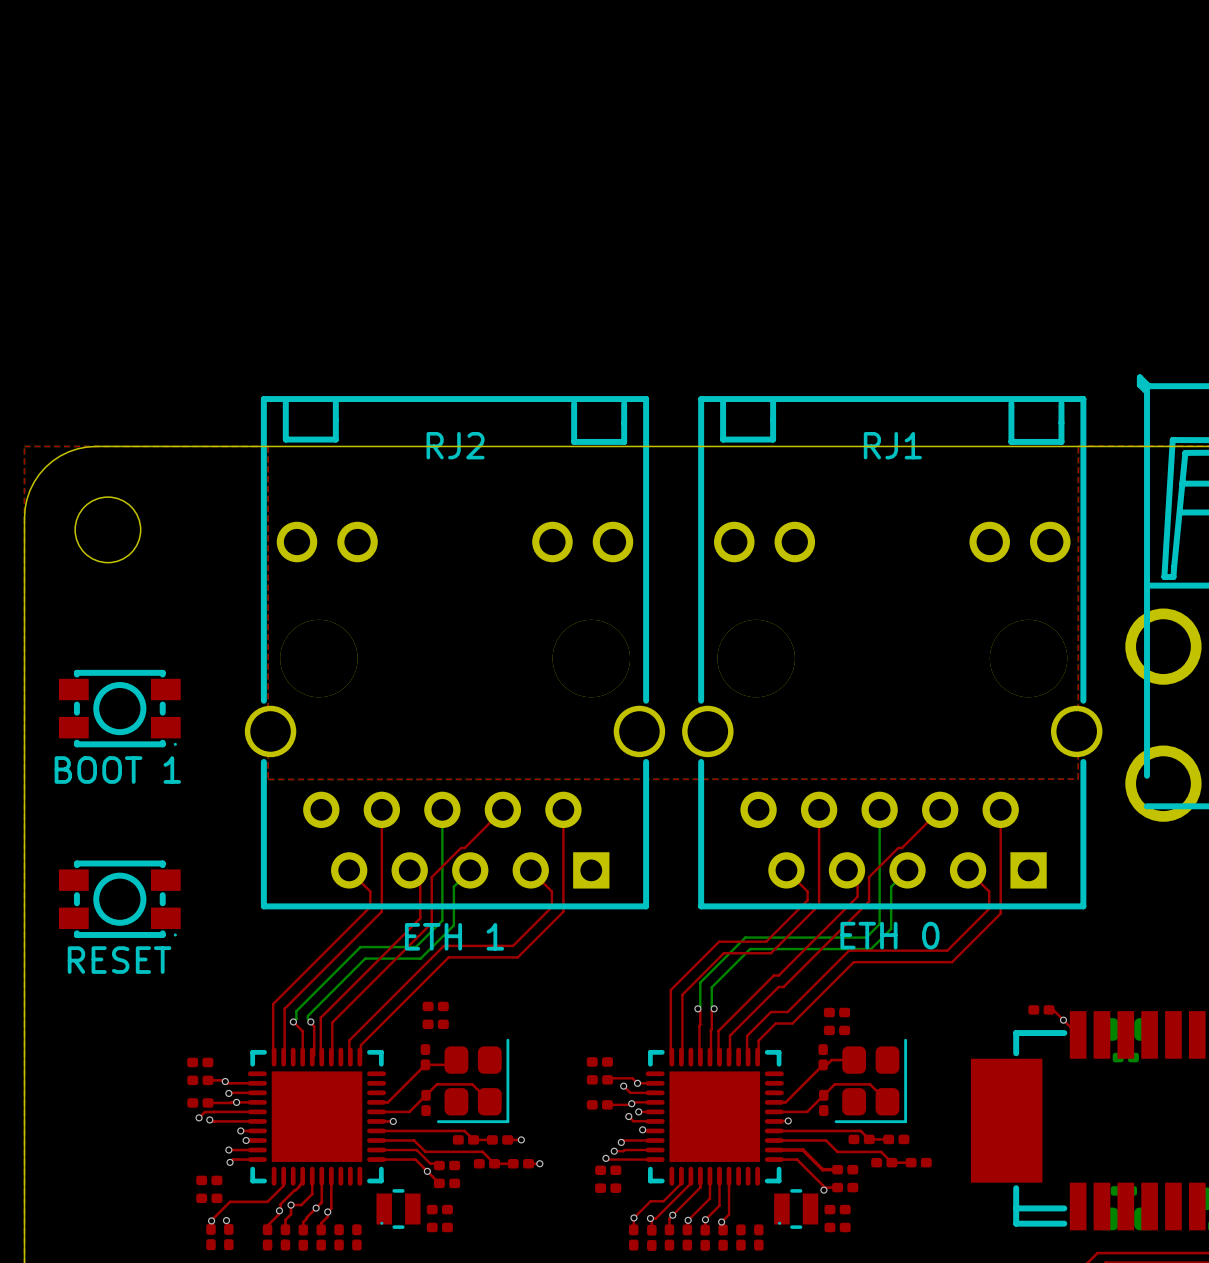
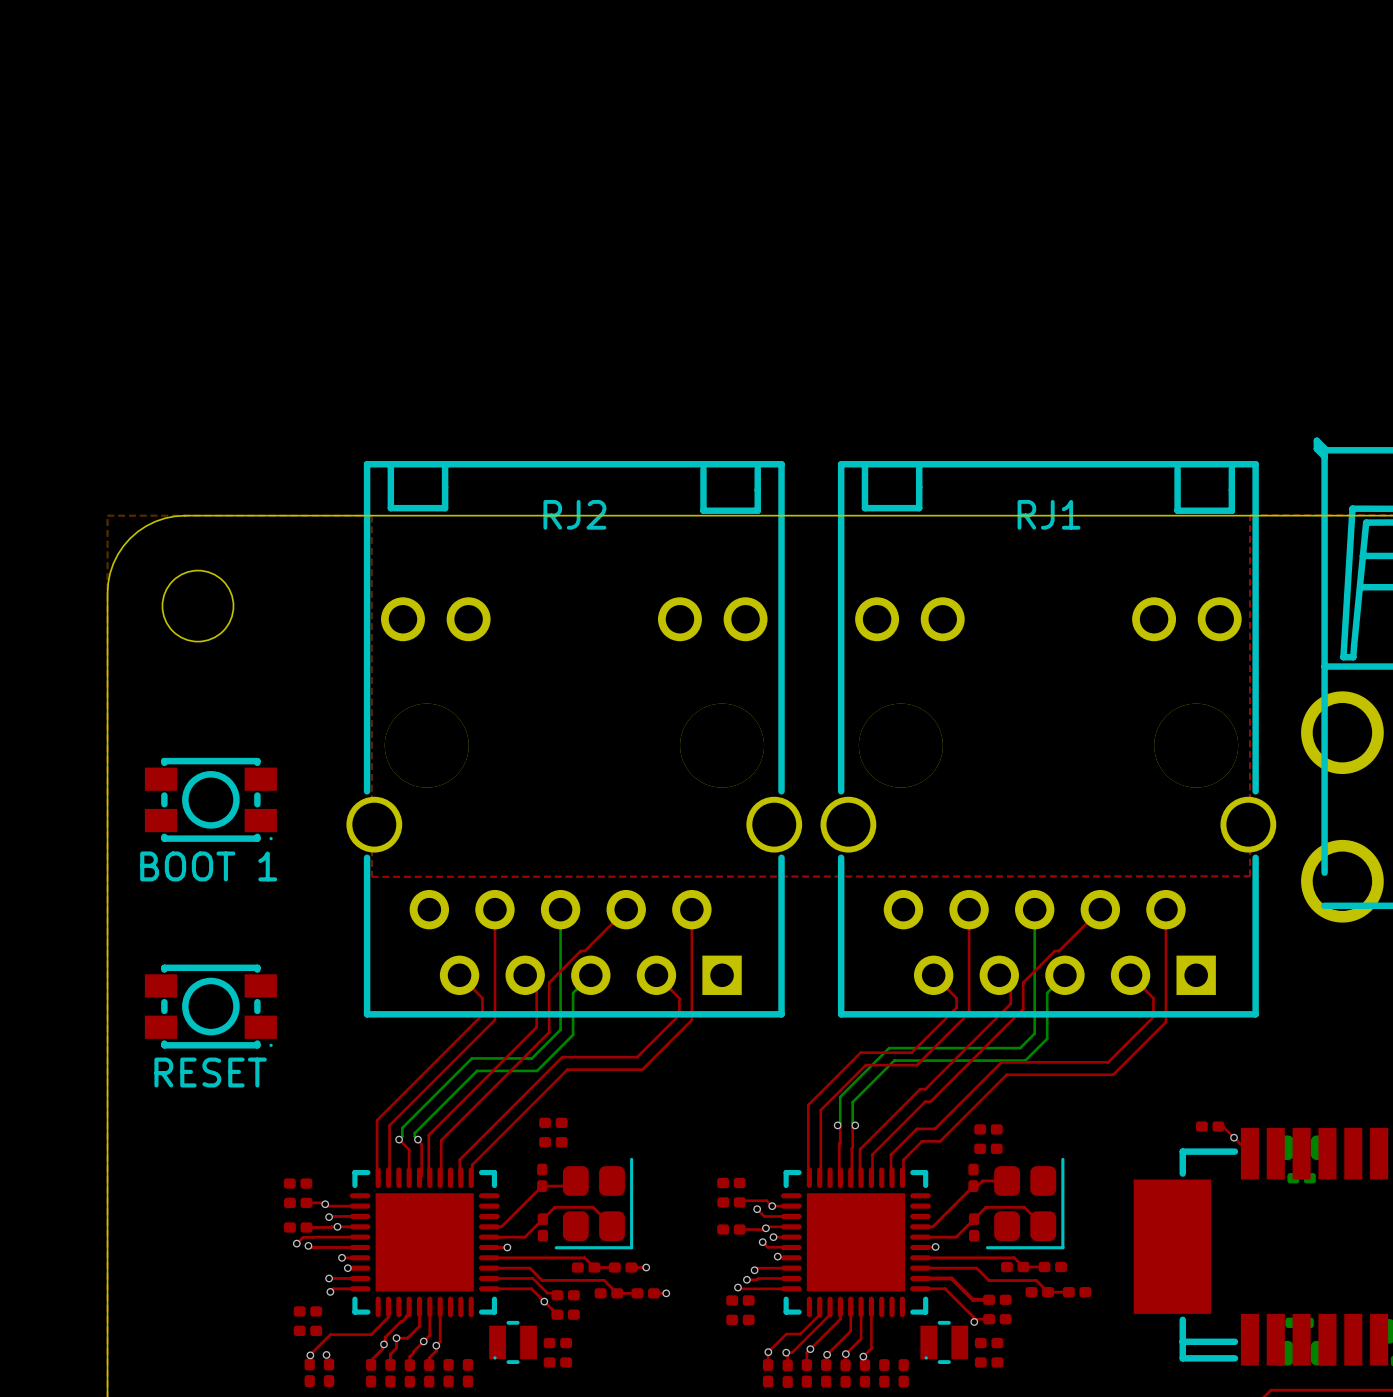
text: ETH 0 (889, 935) -> none
text: ETH 1 (454, 936) -> none

